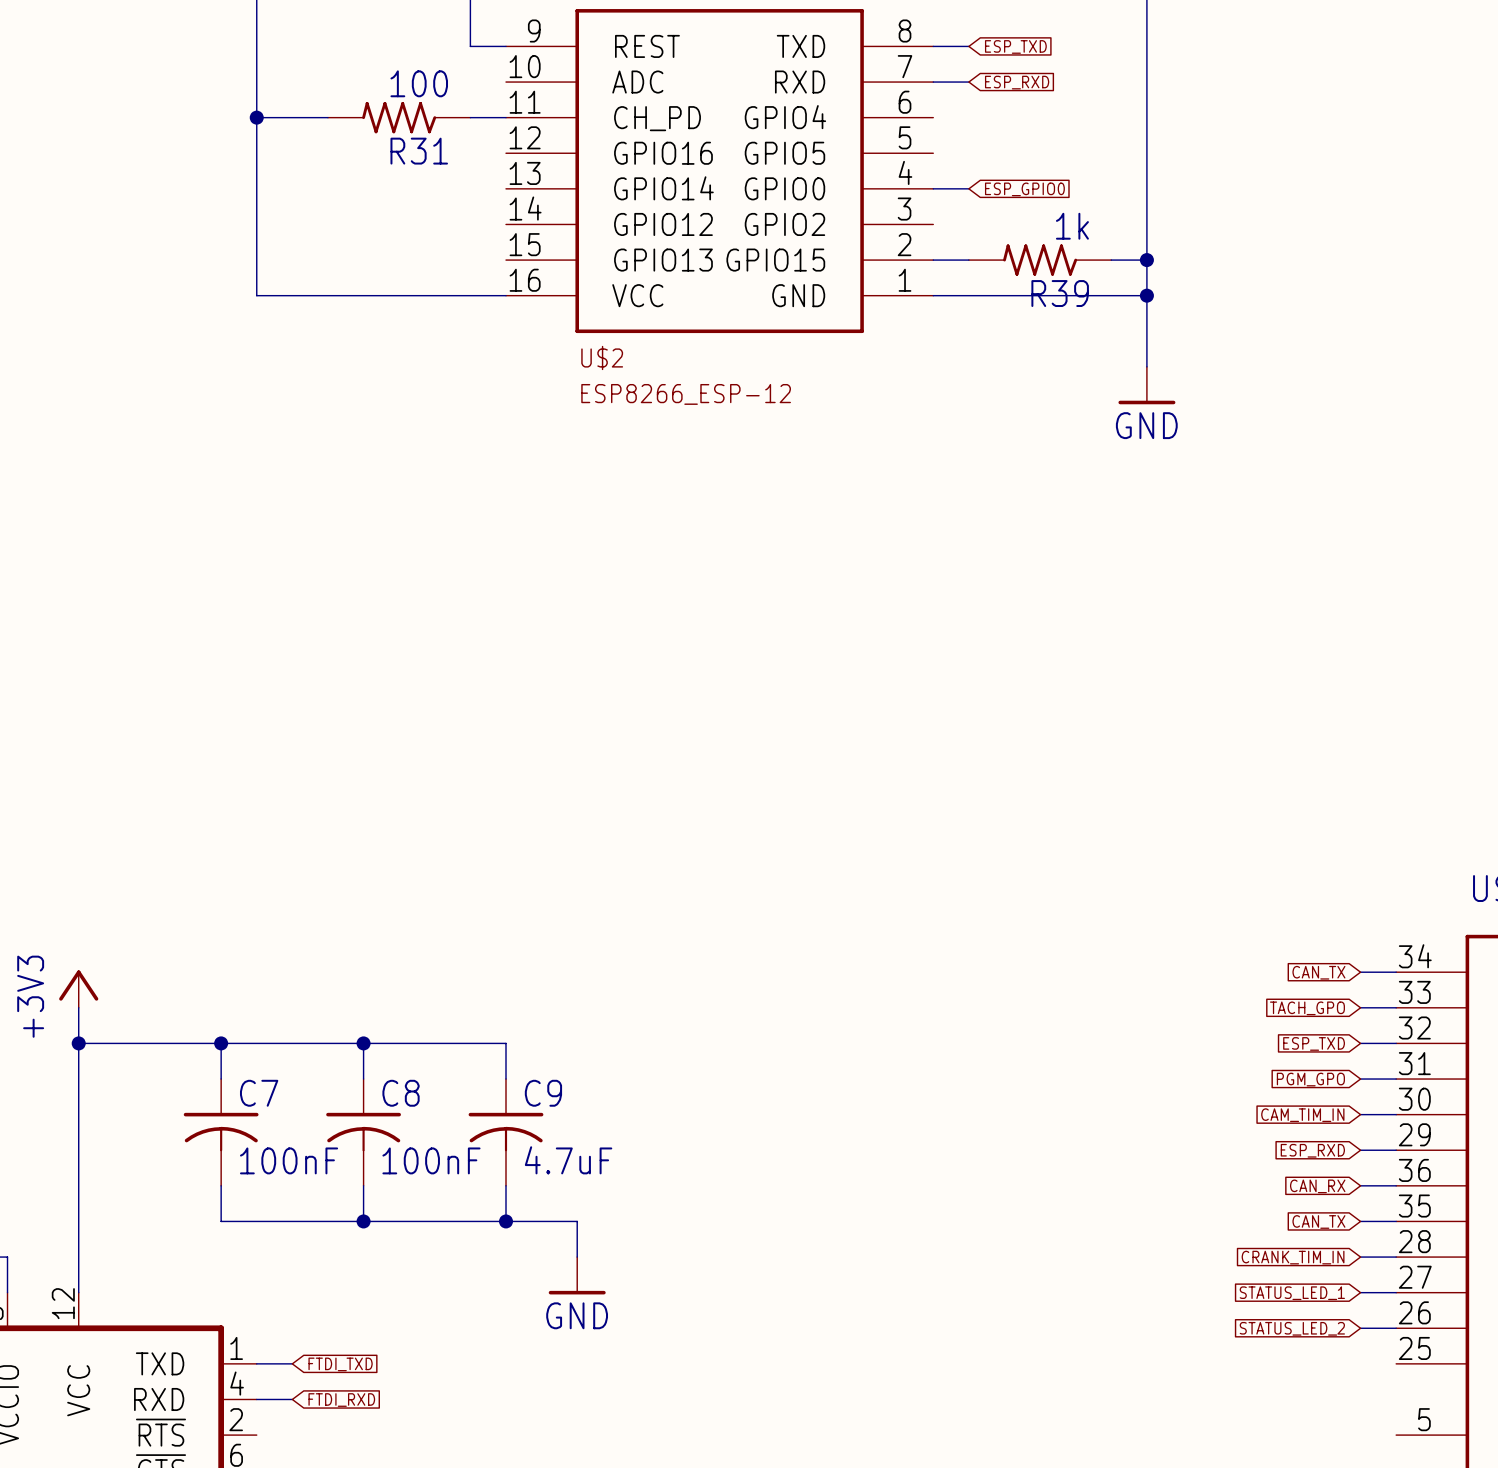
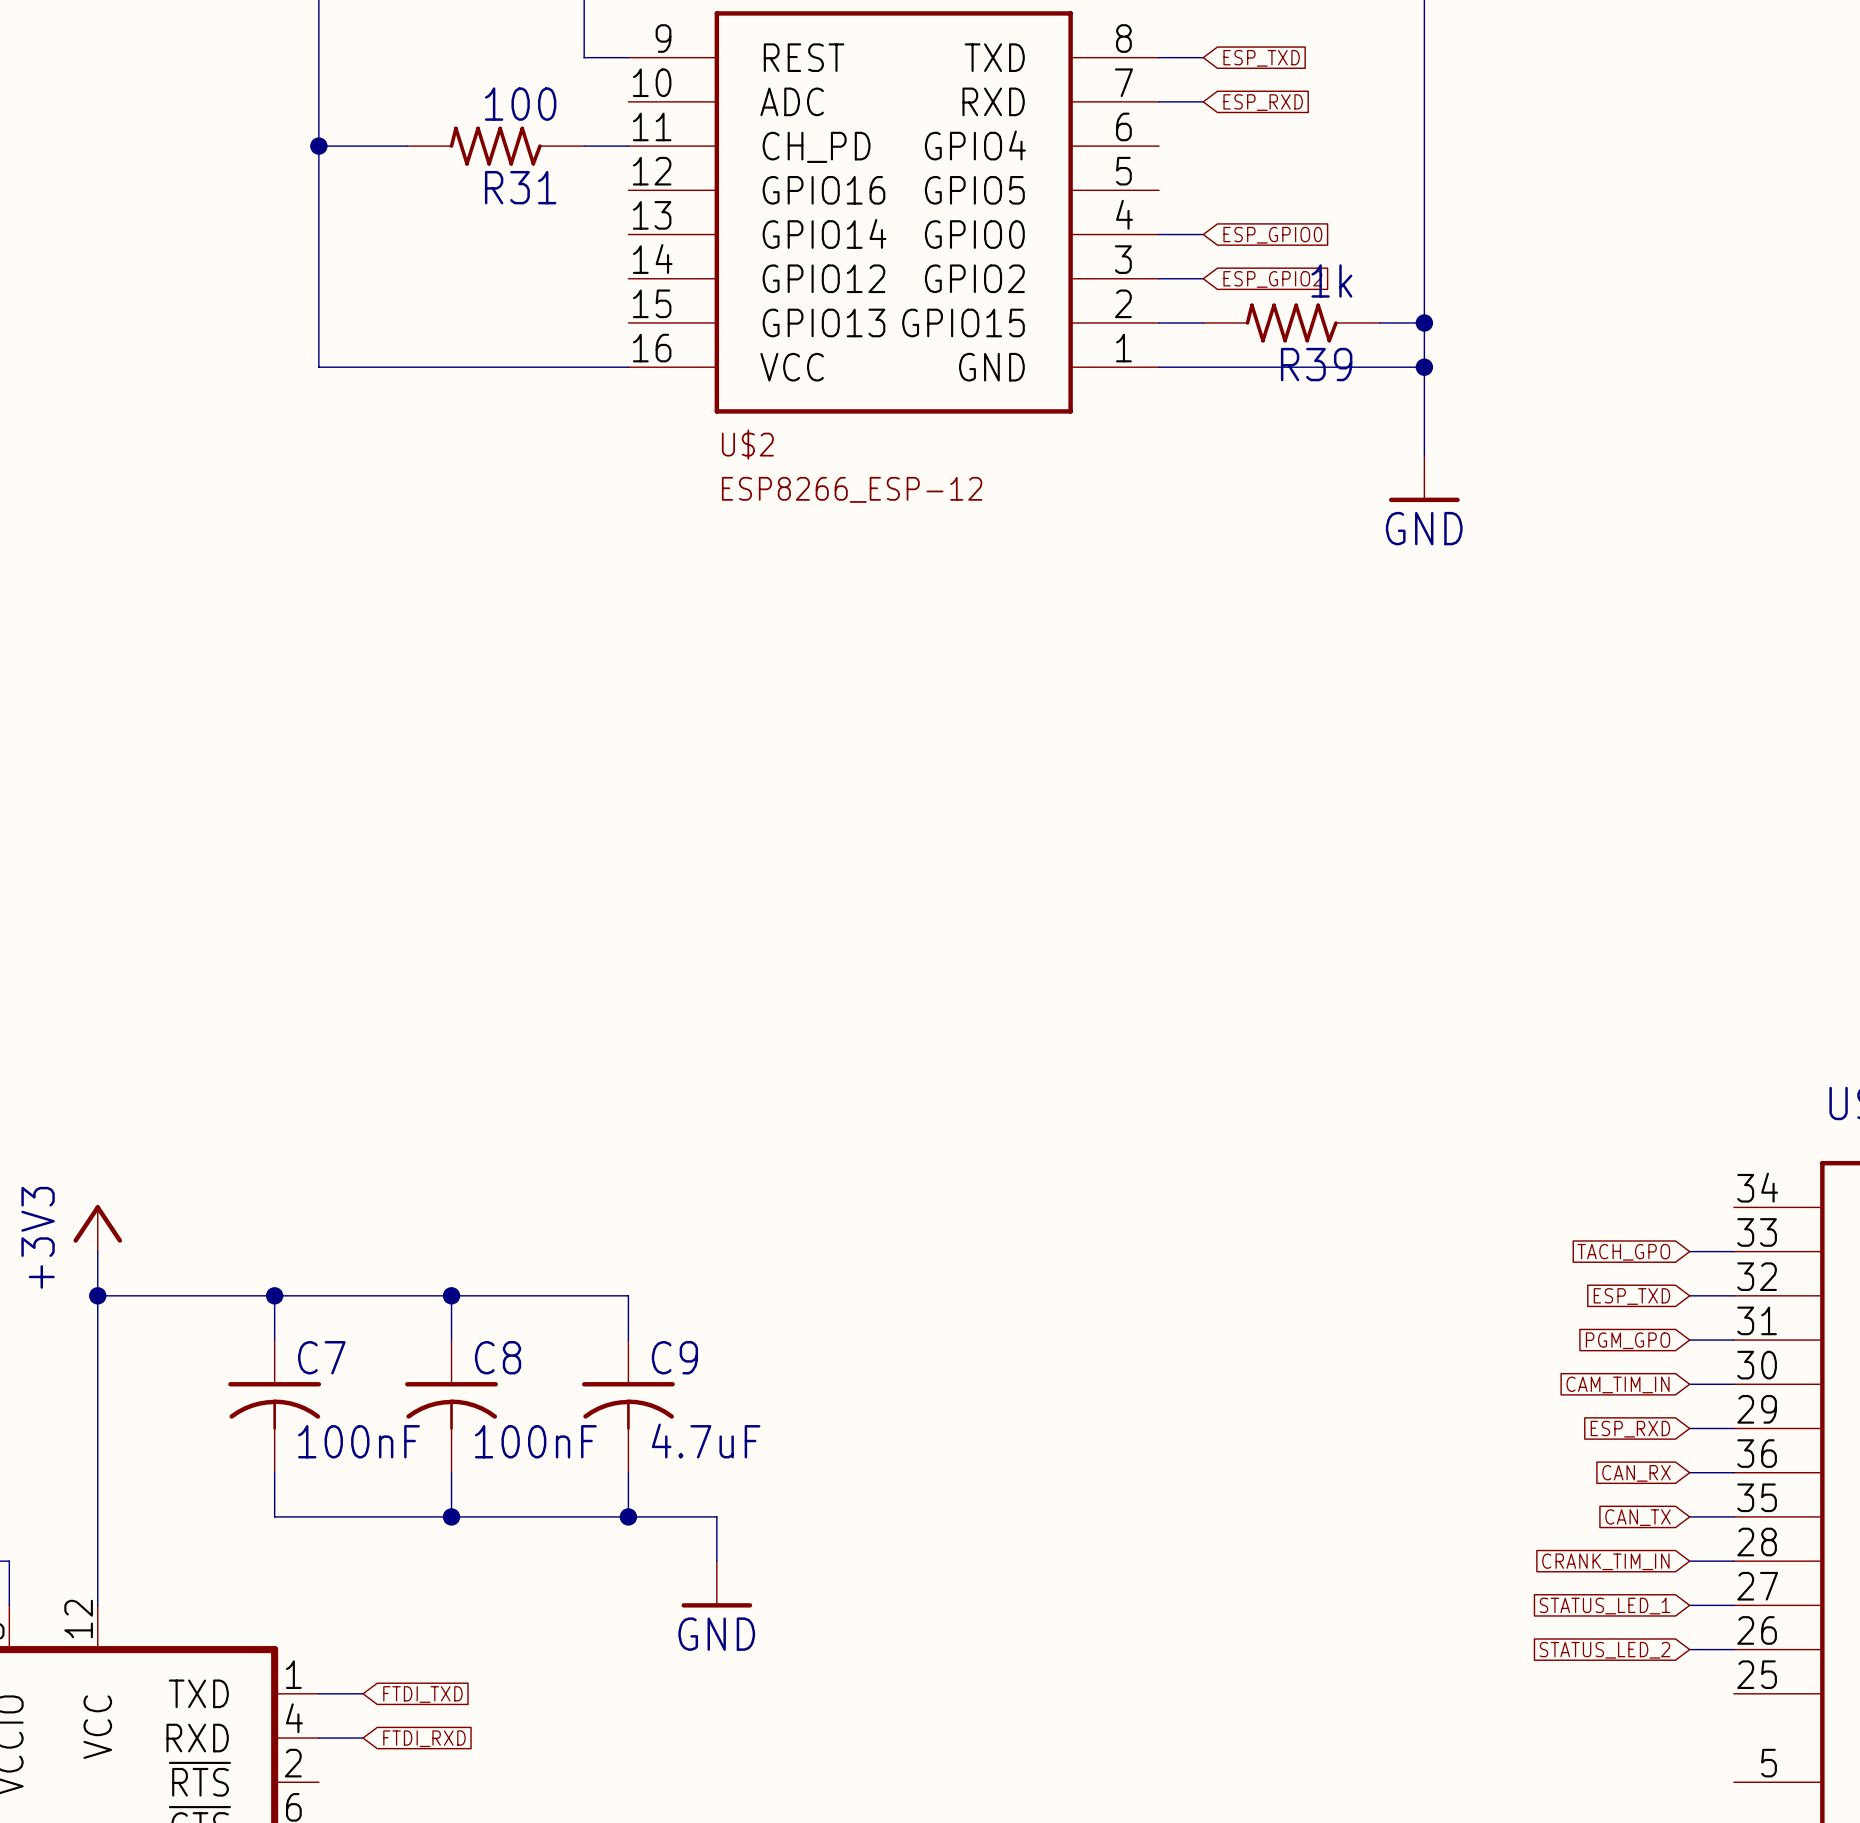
wire: none -> (1159, 278) (1203, 278)
global label: none -> ESP_GPIO2 (1272, 279)
global label: CAN_TX (1318, 972) -> none
wire: (1360, 972) (1396, 972) -> none

